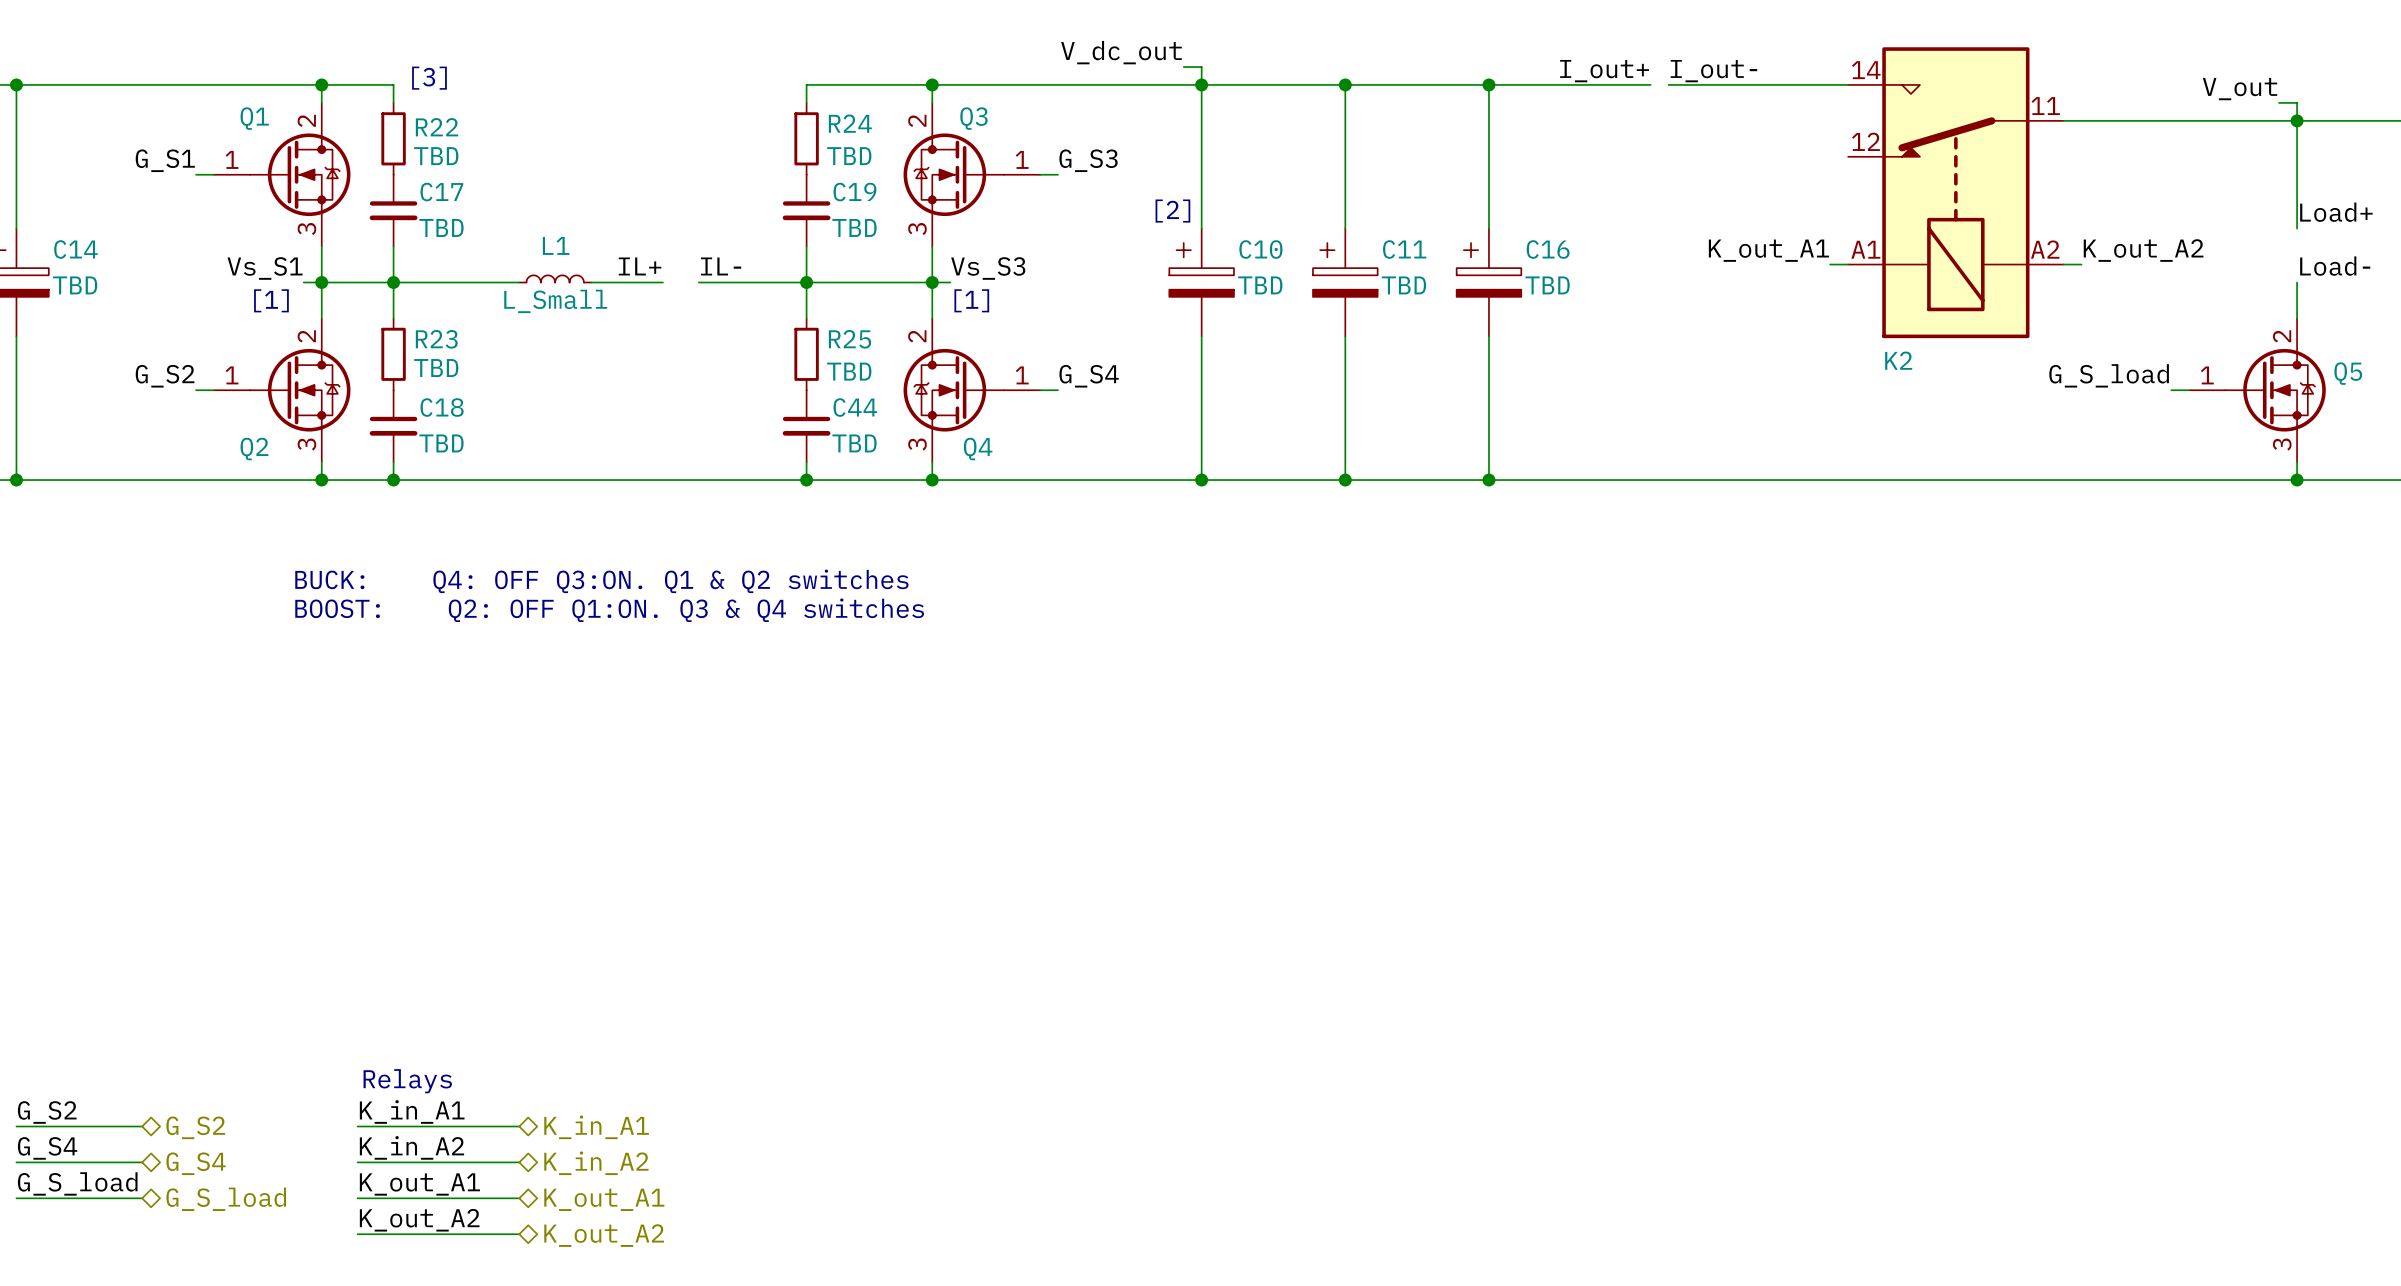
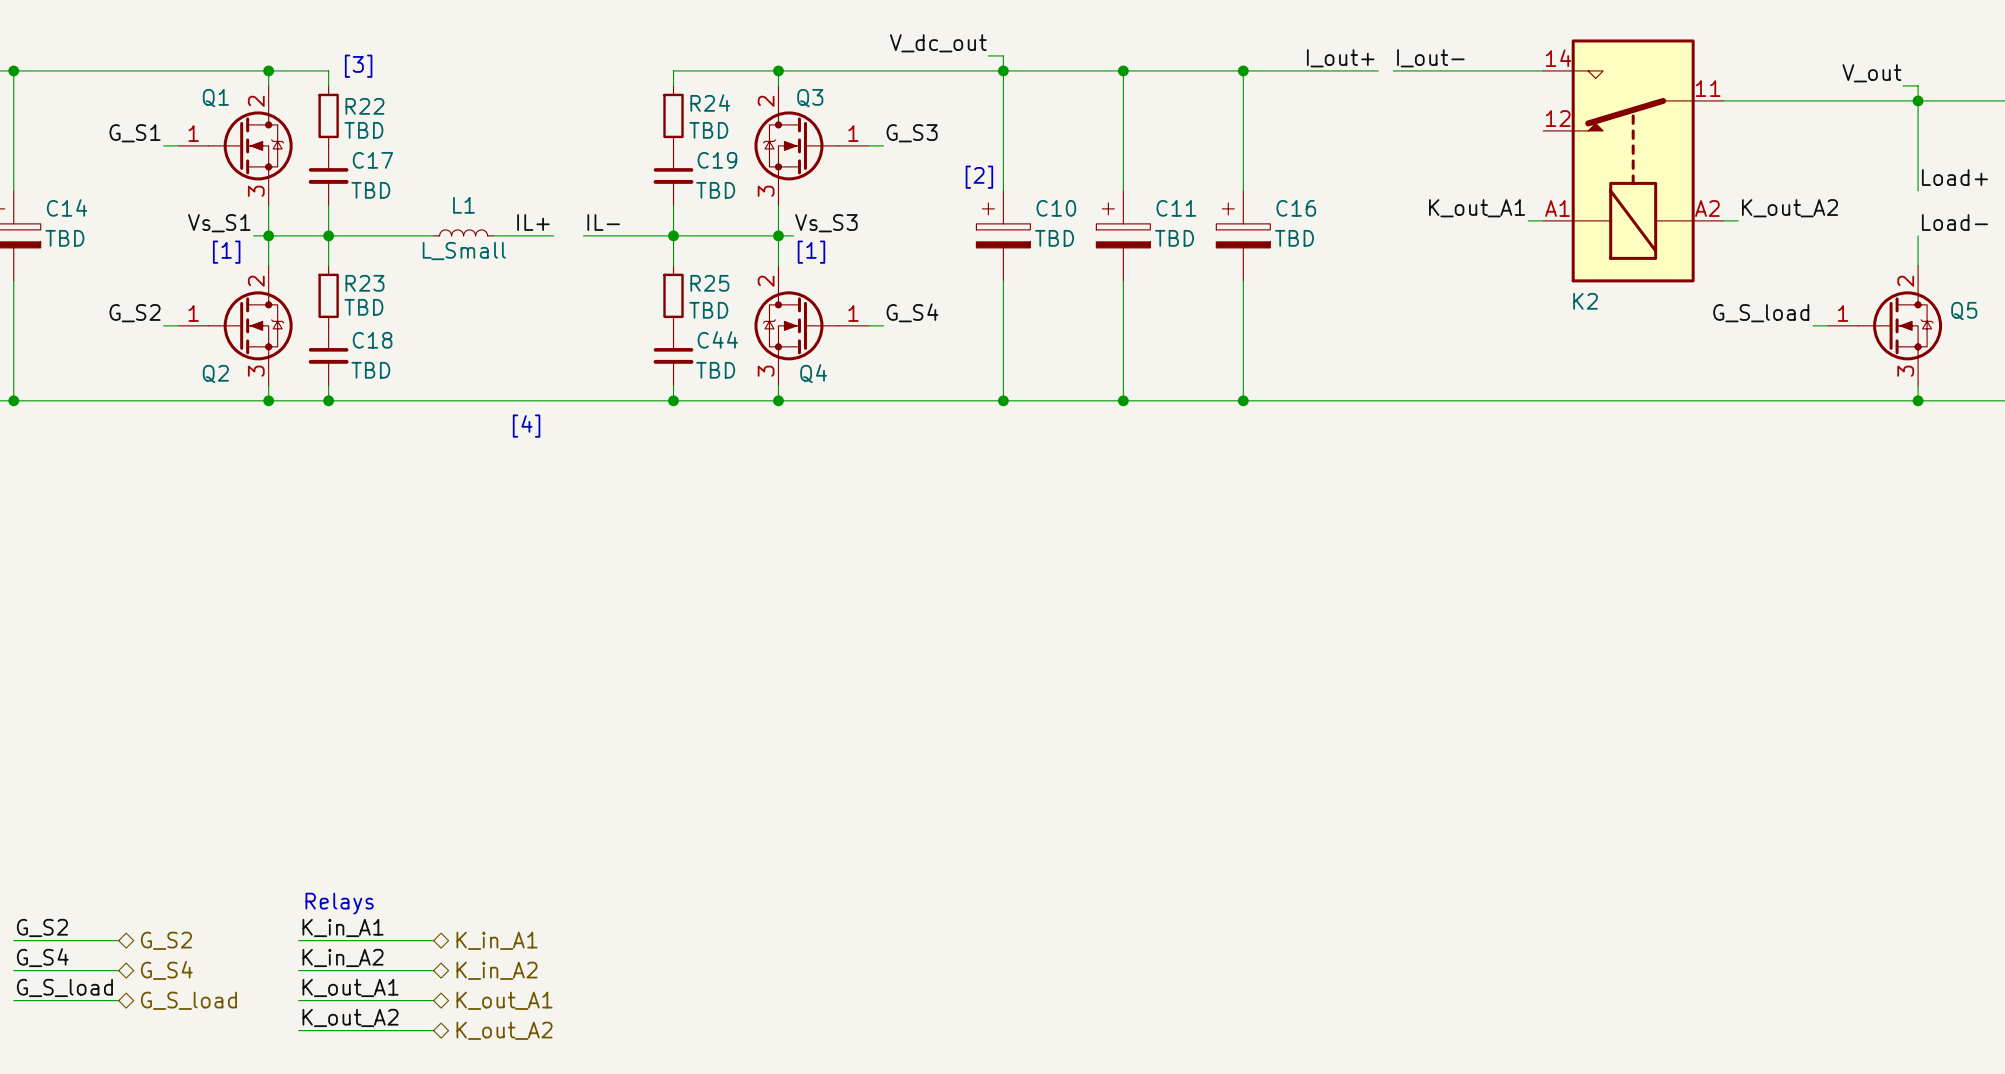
text: none -> [4] (526, 426)
text: BUCK: Q4: OFF Q3:ON. Q1 & Q2 switches (601, 581) -> none
text: BOOST: Q2: OFF Q1:ON. Q3 & Q4 switches (609, 610) -> none

